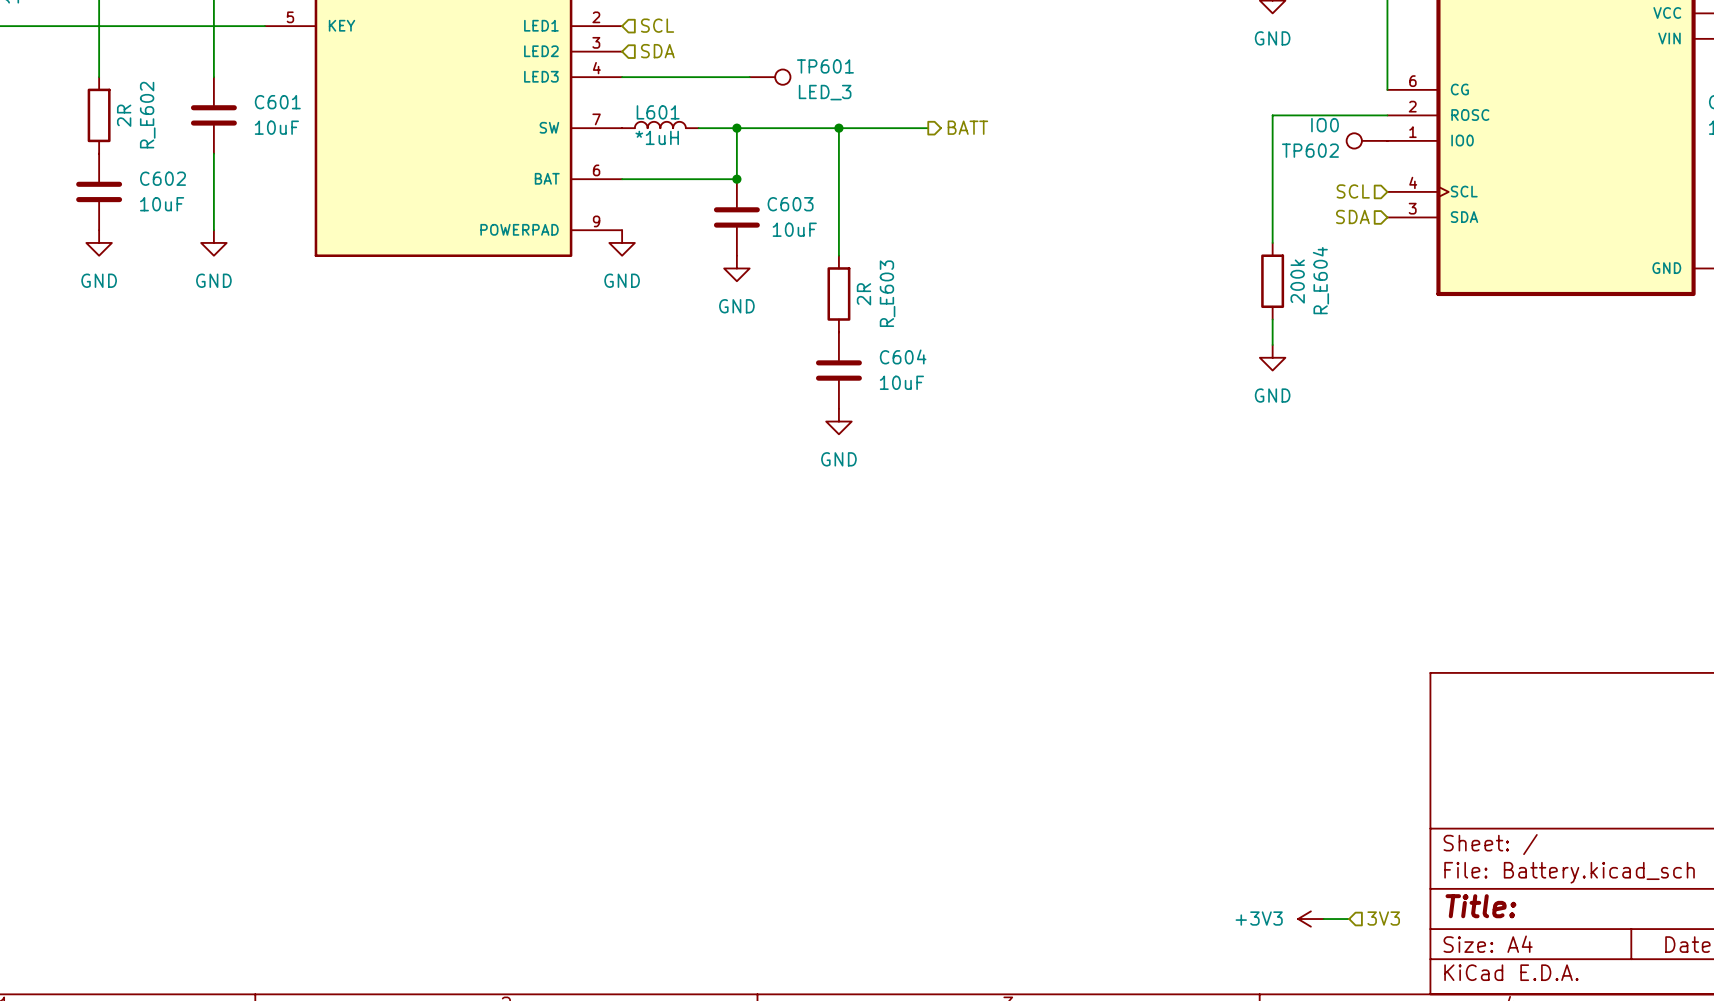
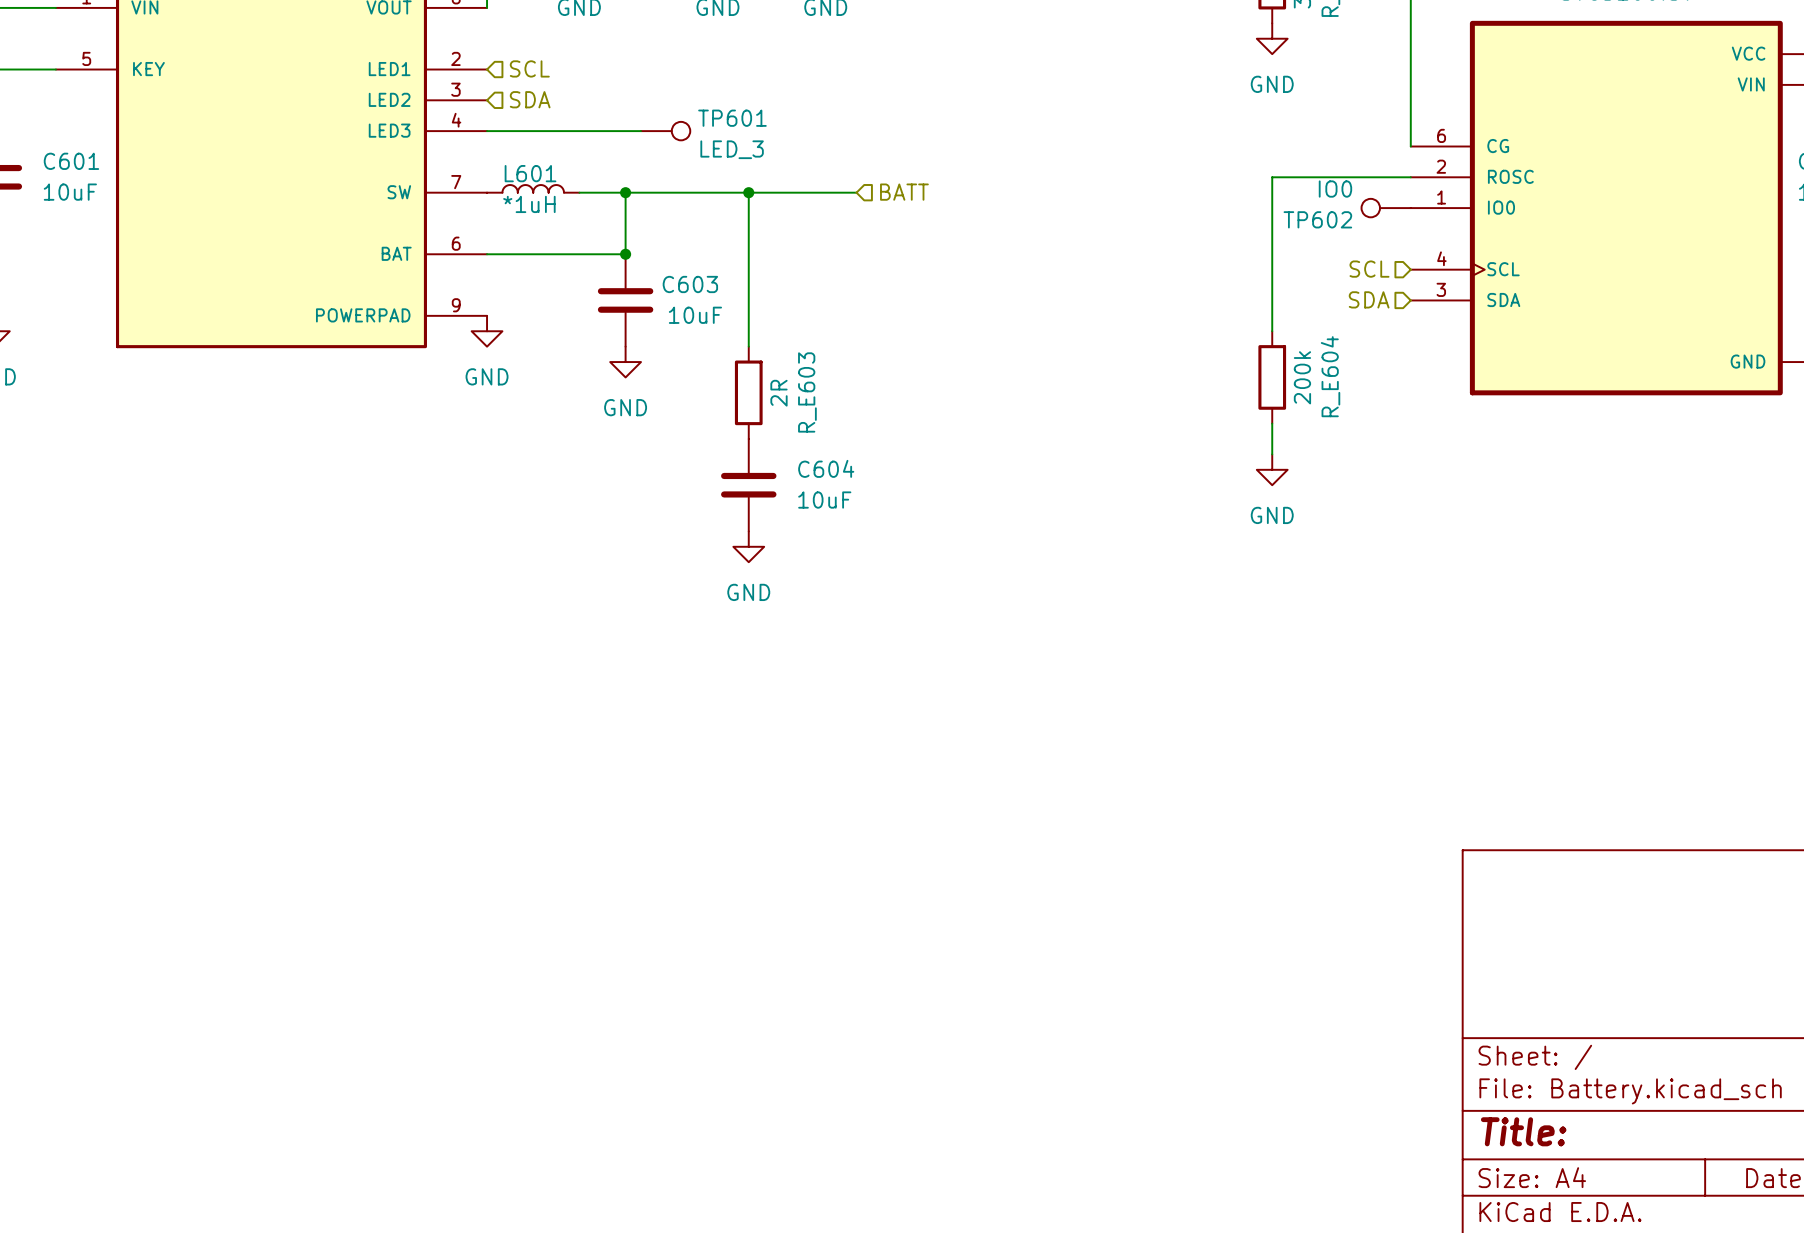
hierarchical label shape: output (967, 127) -> input (904, 192)
hierarchical label: 3V3 (1383, 918) -> none
power symbol: +3V3 (1310, 919) -> none
wire: (1323, 919) (1349, 919) -> none

